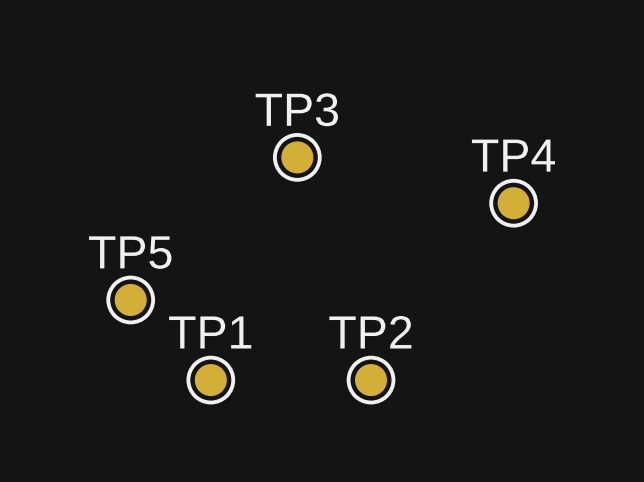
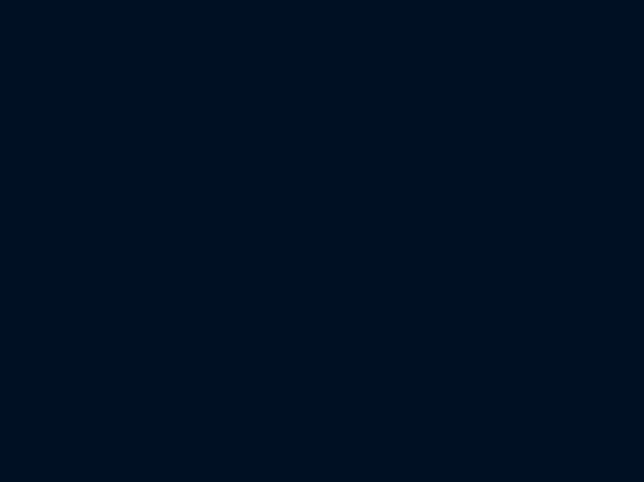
TP3: (297, 157) -> none
TP4: (513, 203) -> none
TP5: (130, 299) -> none
TP1: (210, 380) -> none
TP2: (371, 380) -> none

